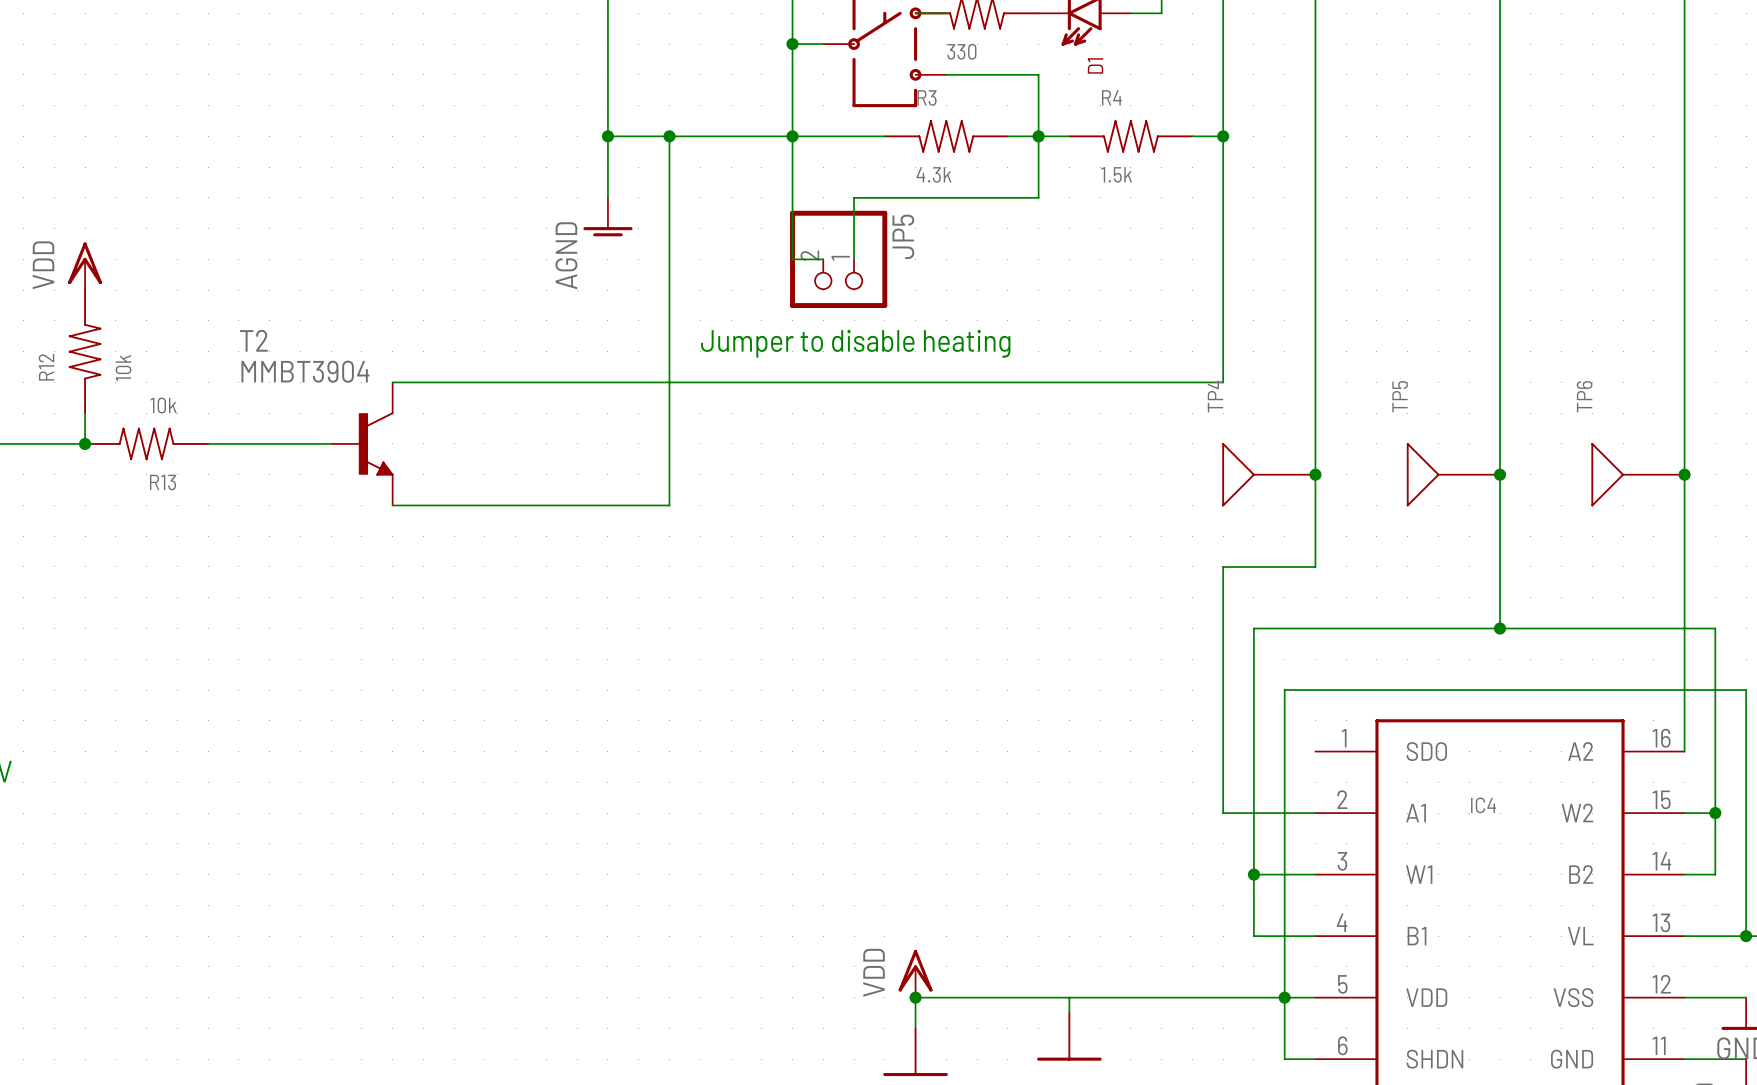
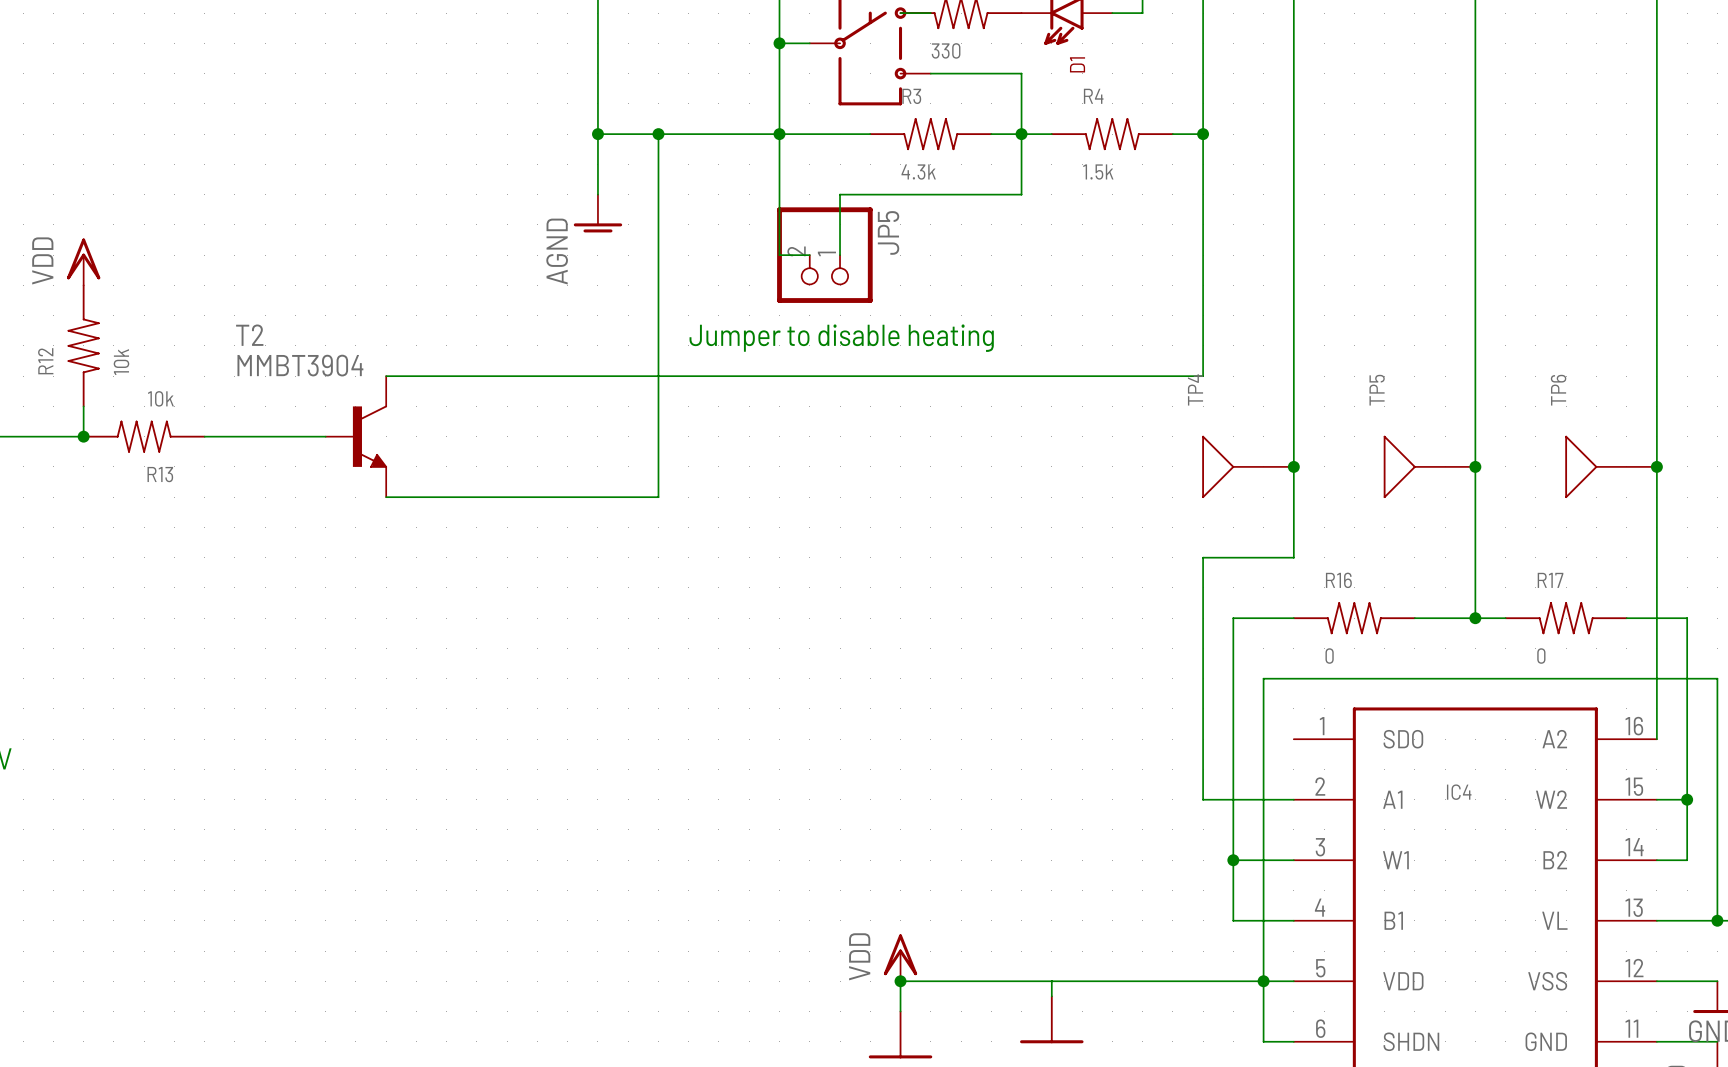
R16: none -> 0 (1354, 618)
R17: none -> 0 (1566, 618)

